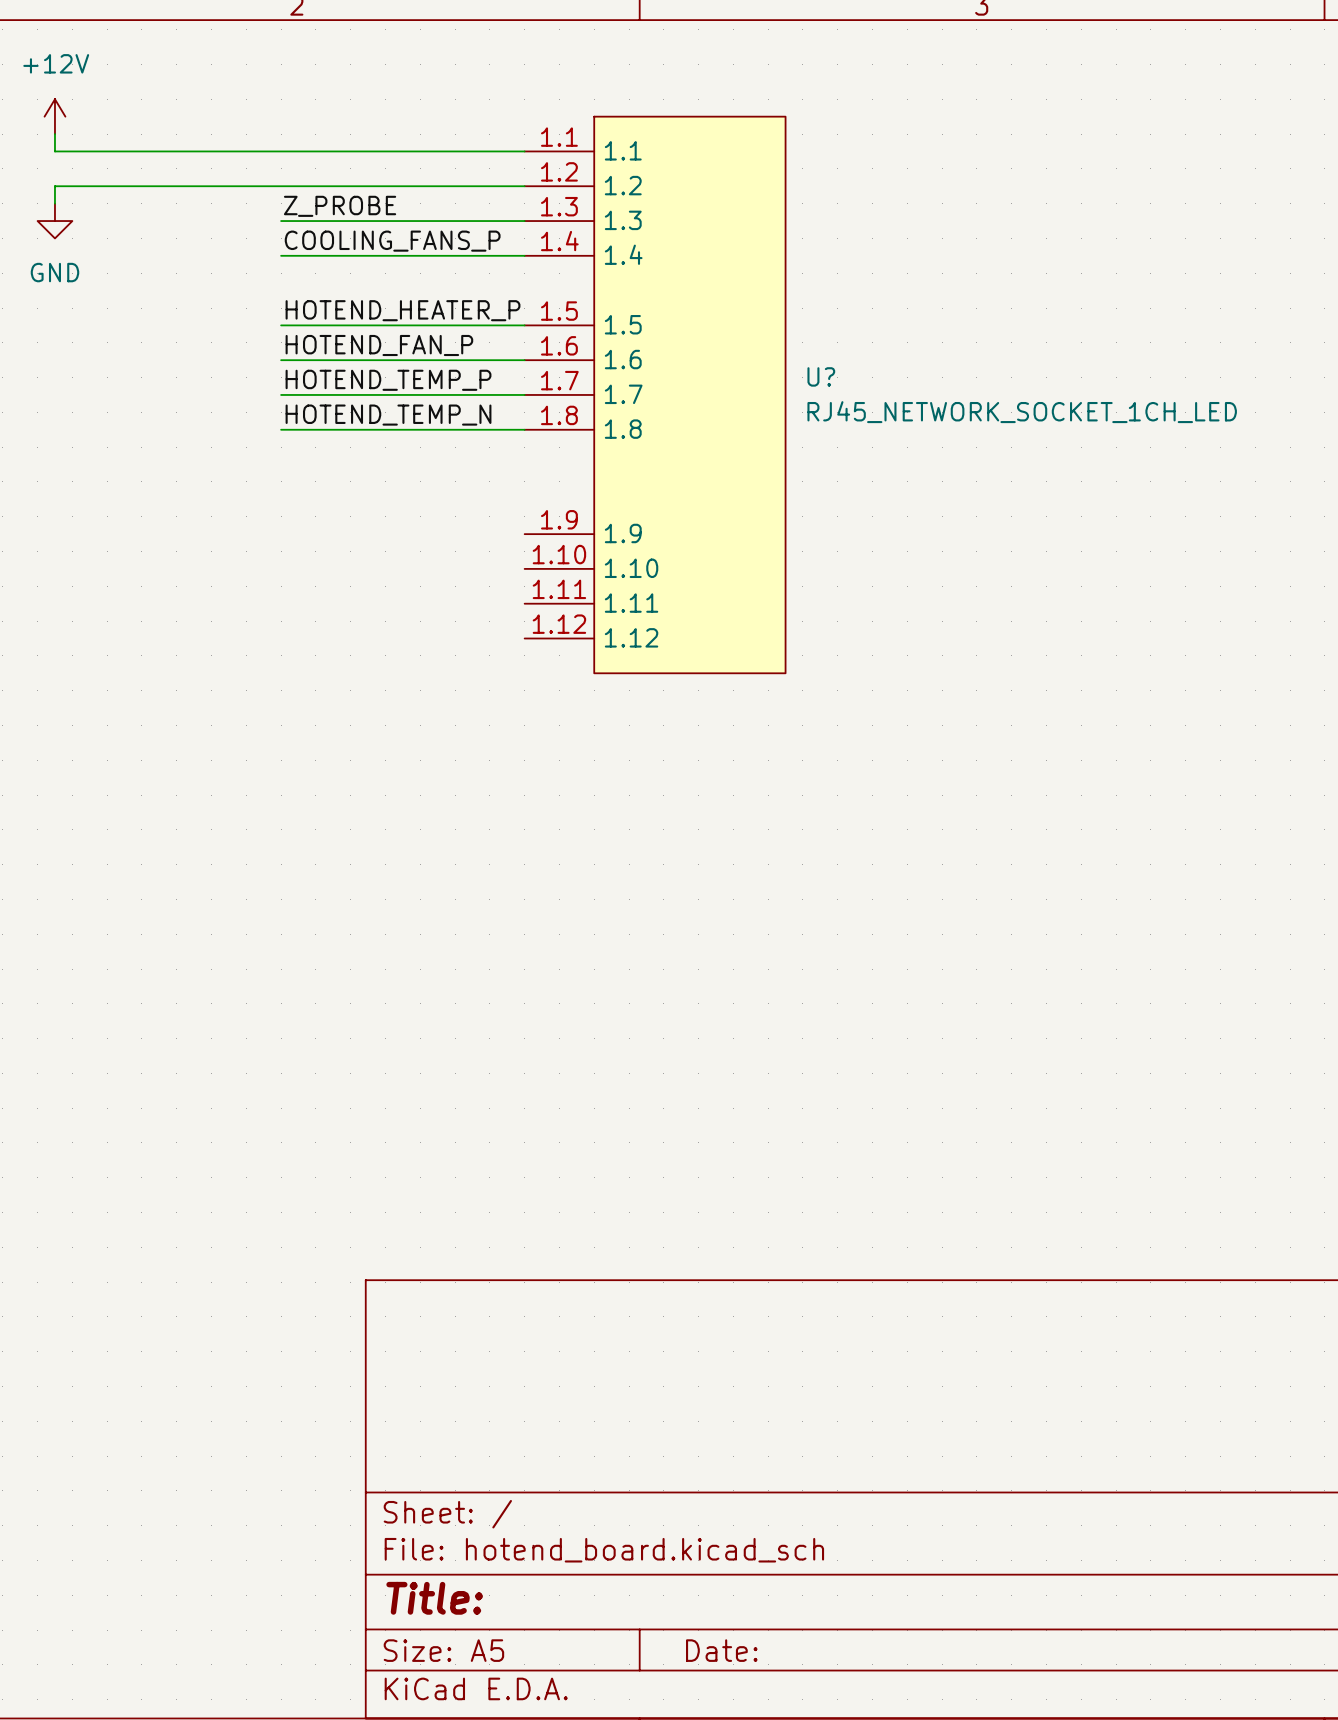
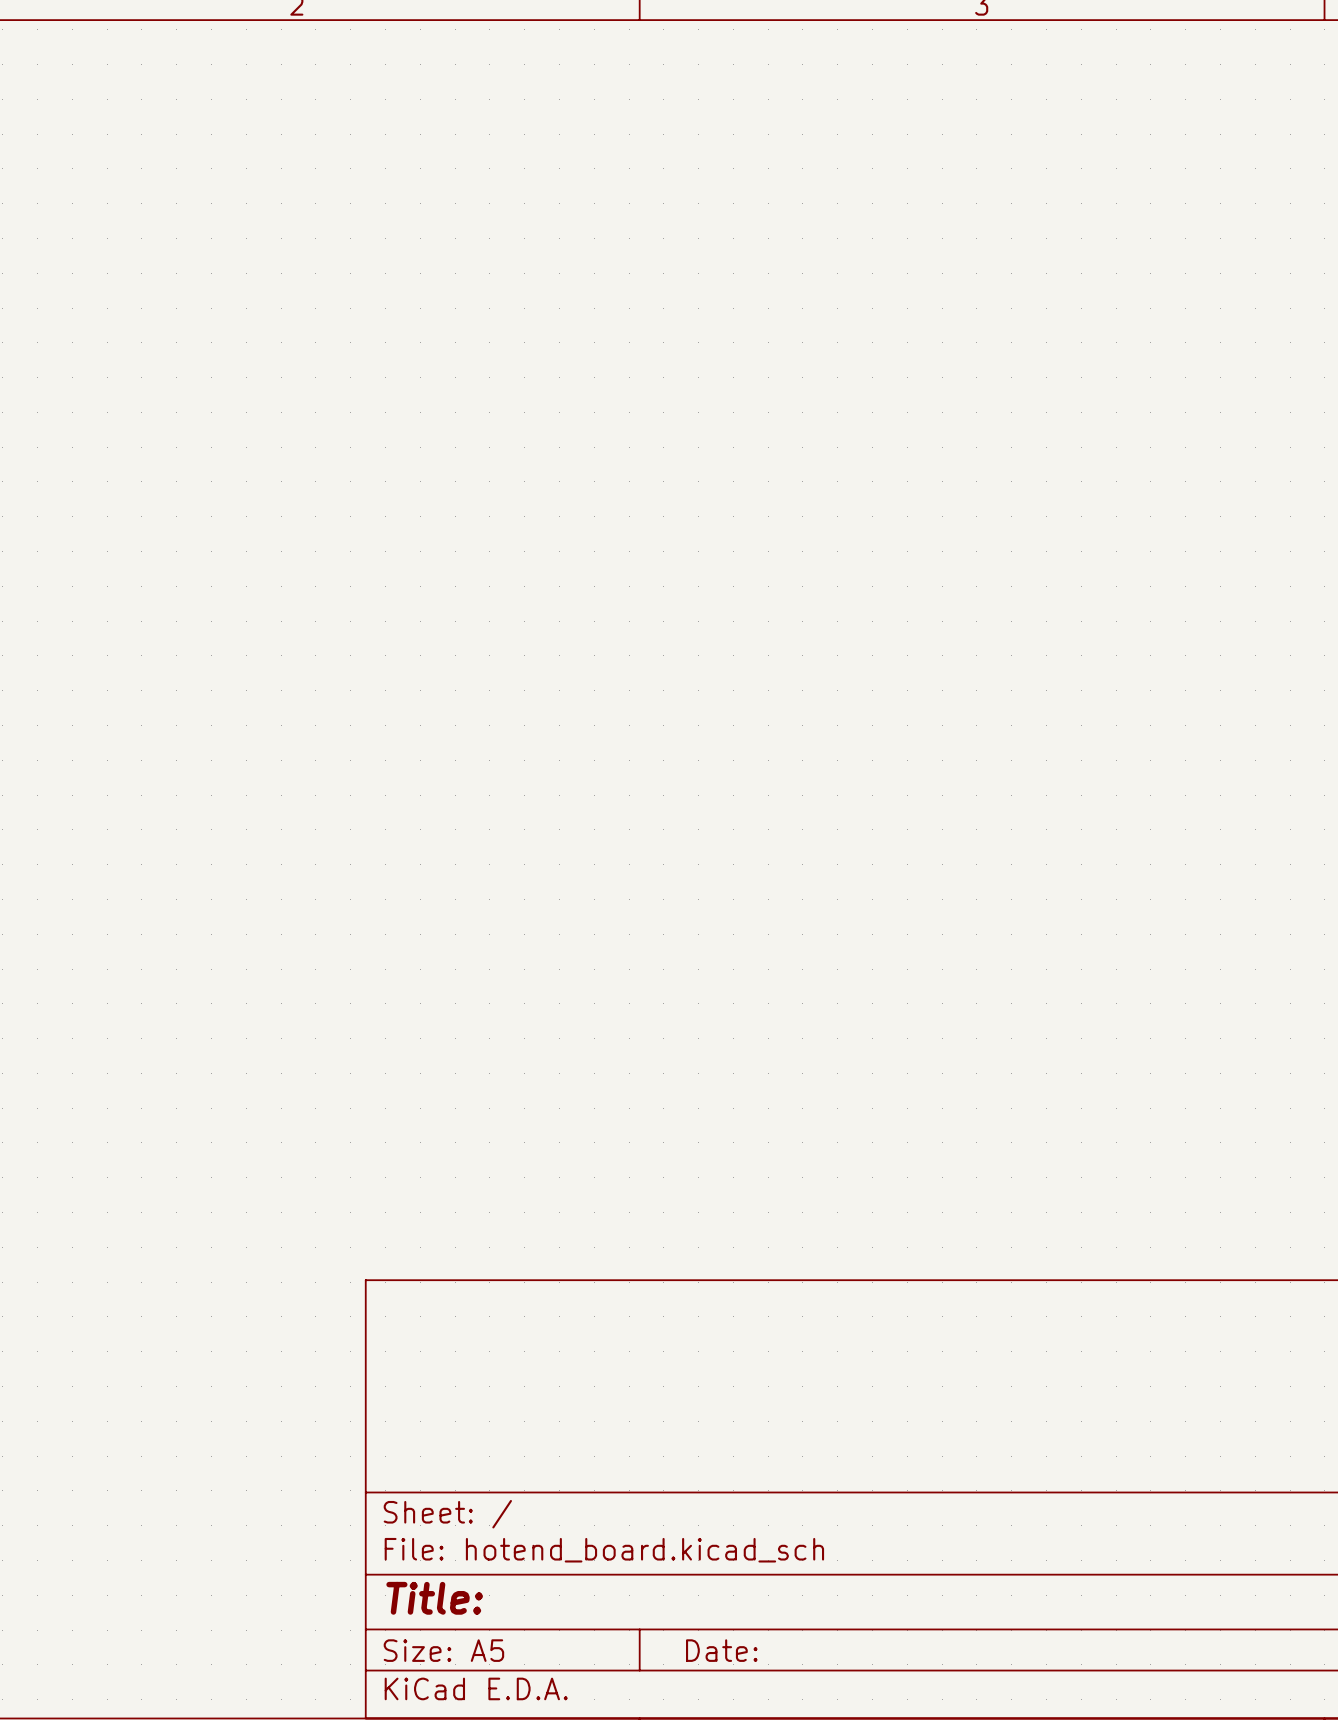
power symbol: +12V (54, 116) -> none
wire: (54, 134) (54, 151) (524, 151) -> none
wire: (524, 186) (54, 186) (54, 203) -> none
label: Z_PROBE (340, 206) -> none
power symbol: GND (54, 221) -> none
wire: (281, 221) (524, 221) -> none
label: COOLING_FANS_P (392, 241) -> none
wire: (281, 255) (524, 255) -> none
label: HOTEND_HEATER_P (403, 310) -> none
wire: (281, 325) (524, 325) -> none
label: HOTEND_FAN_P (379, 345) -> none
wire: (281, 360) (524, 360) -> none
label: HOTEND_TEMP_P (388, 380) -> none
wire: (281, 394) (524, 394) -> none
U?: RJ45_NETWORK_SOCKET_1CH_LED (655, 394) -> none
label: HOTEND_TEMP_N (388, 415) -> none
wire: (281, 429) (524, 429) -> none

